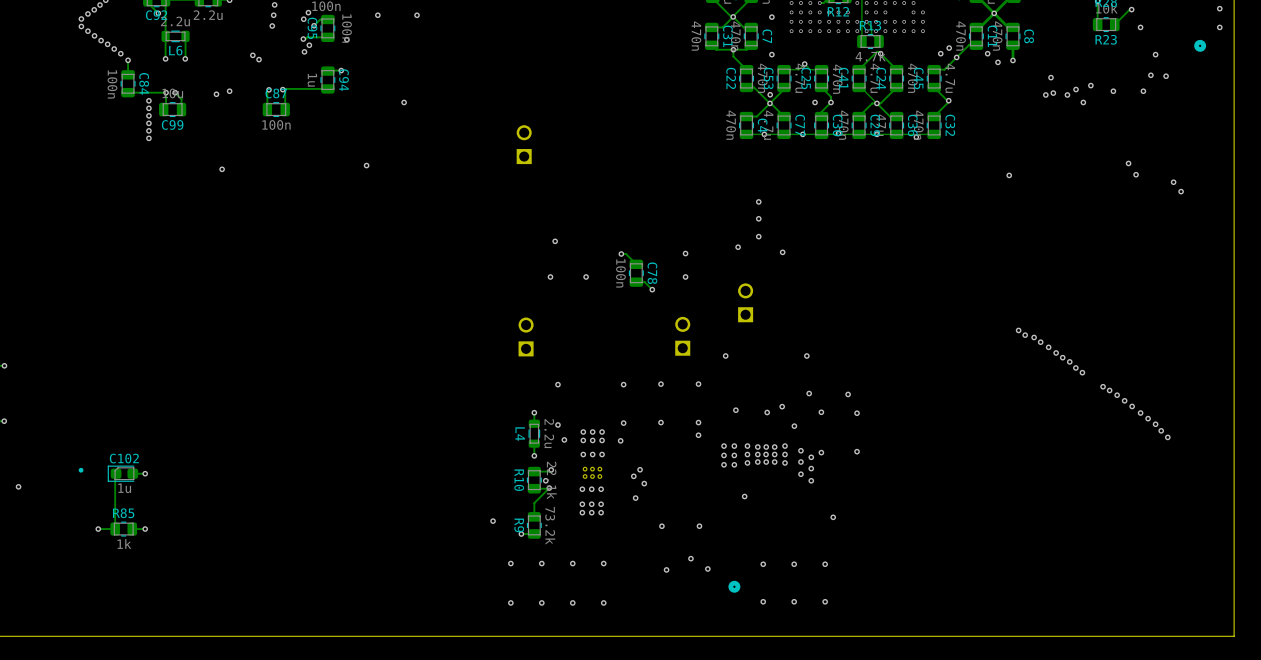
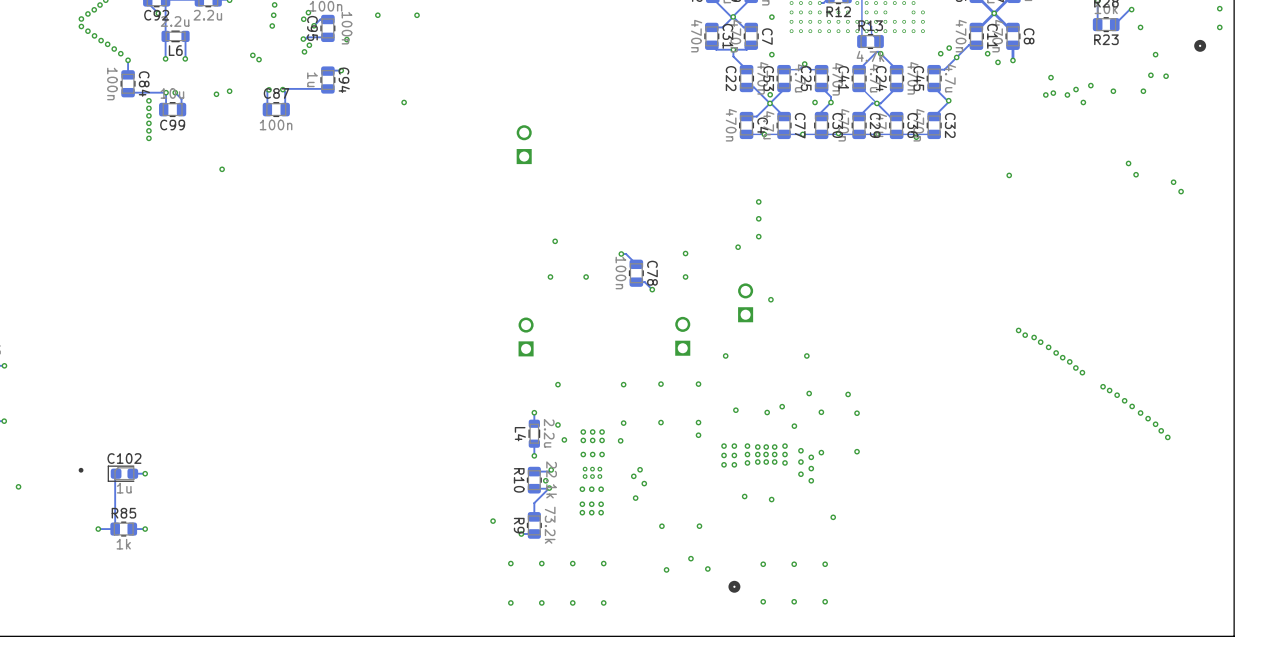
via: (366, 165) -> none
via position: (782, 252) -> (770, 299)
via: none -> (771, 499)

